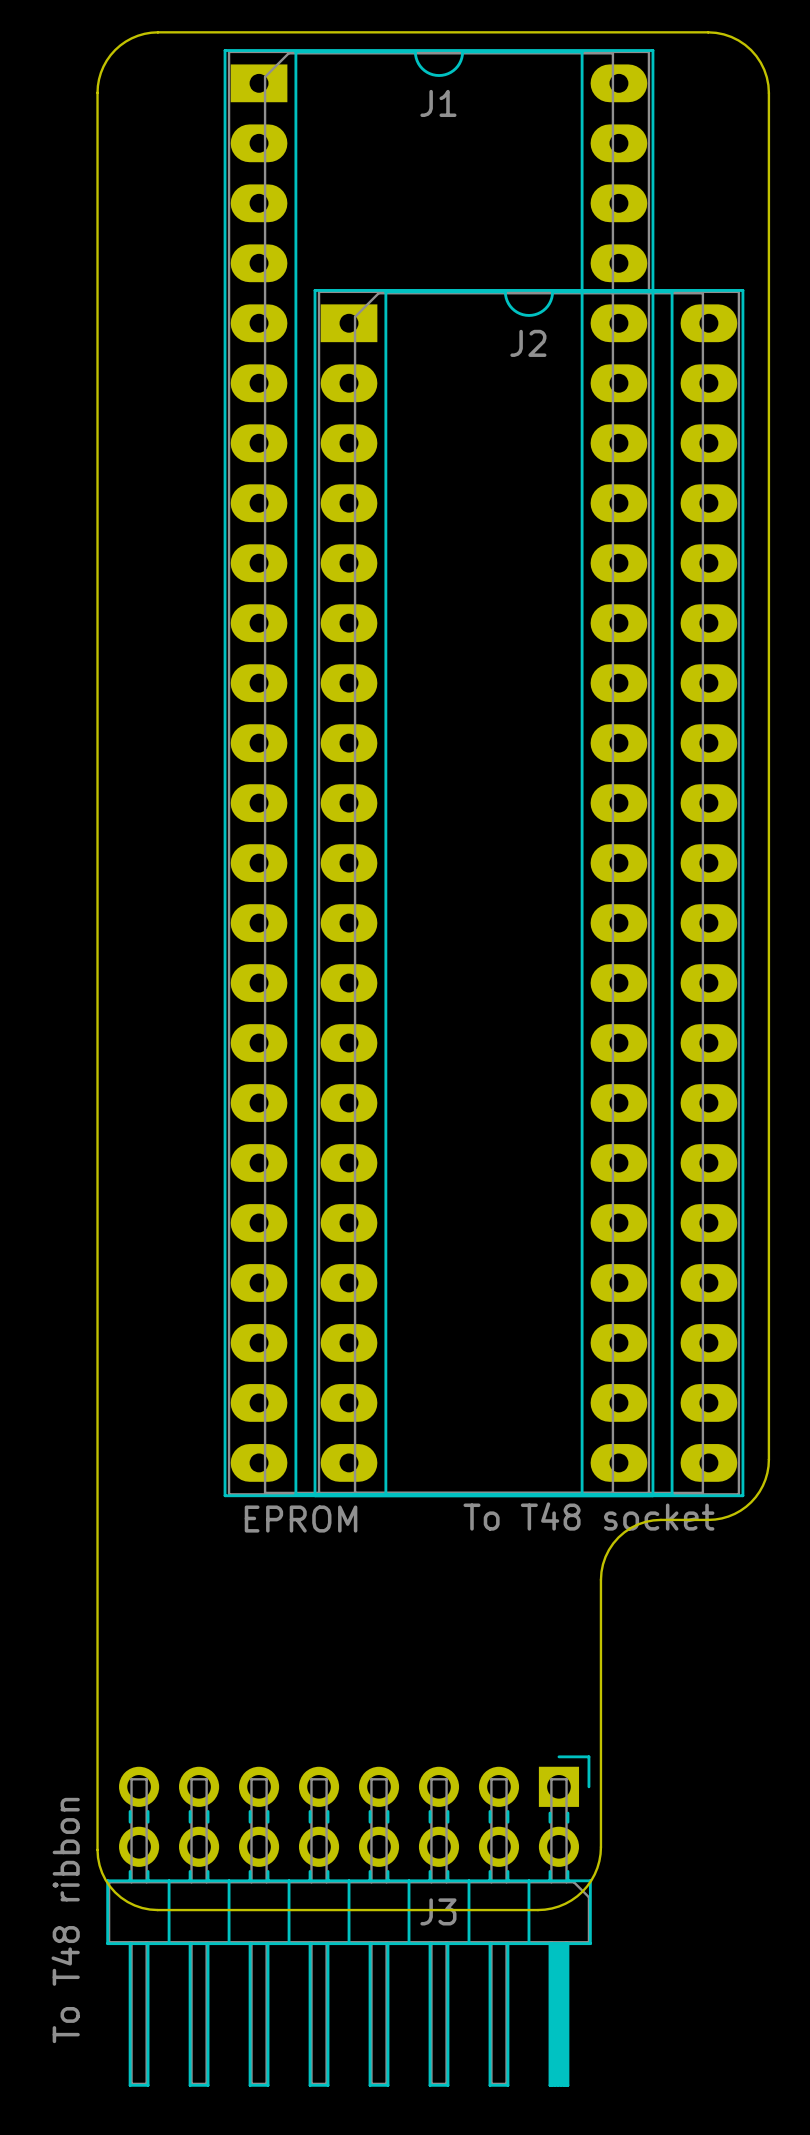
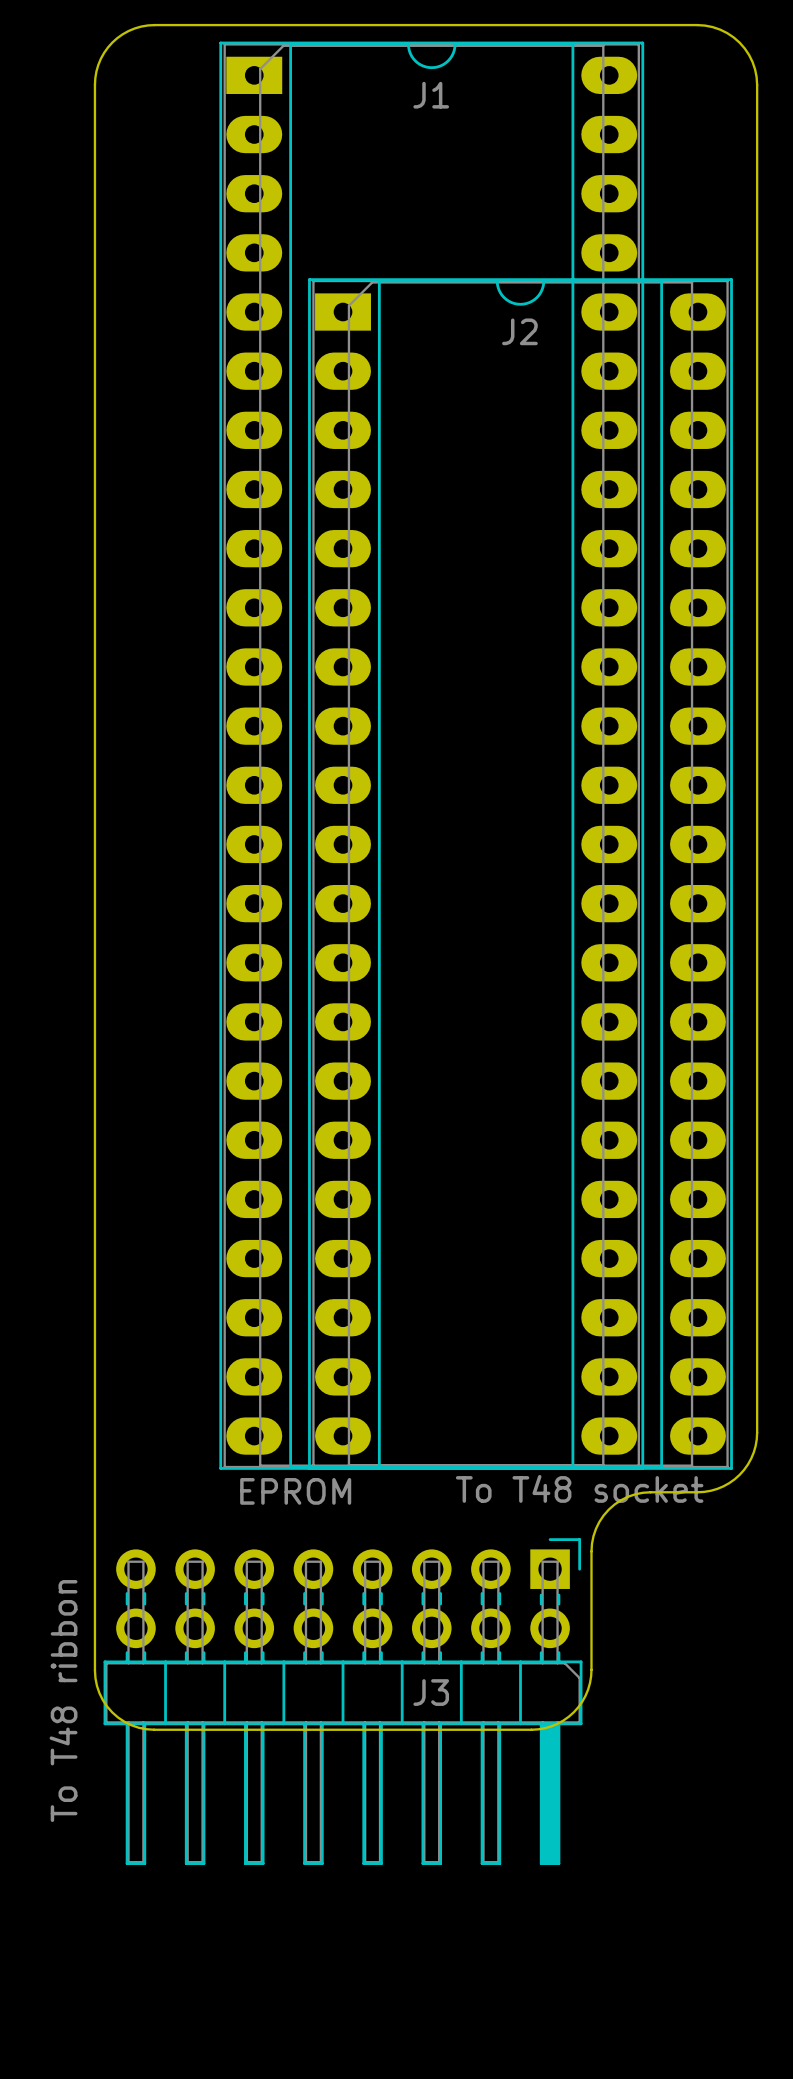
board edge: (600, 1699) (600, 1847) (597, 1867) (587, 1886) (577, 1896) (558, 1906) (537, 1910) (157, 1910) (134, 1905) (121, 1897) (109, 1886) (102, 1872) (98, 1857) (97, 1700) -> (591, 1669) (588, 1689) (582, 1701) (573, 1712) (557, 1723) (544, 1728) (531, 1729) (146, 1729) (124, 1721) (107, 1706) (96, 1685) (94, 1670)
J3 position: (349, 1921) -> (343, 1701)

